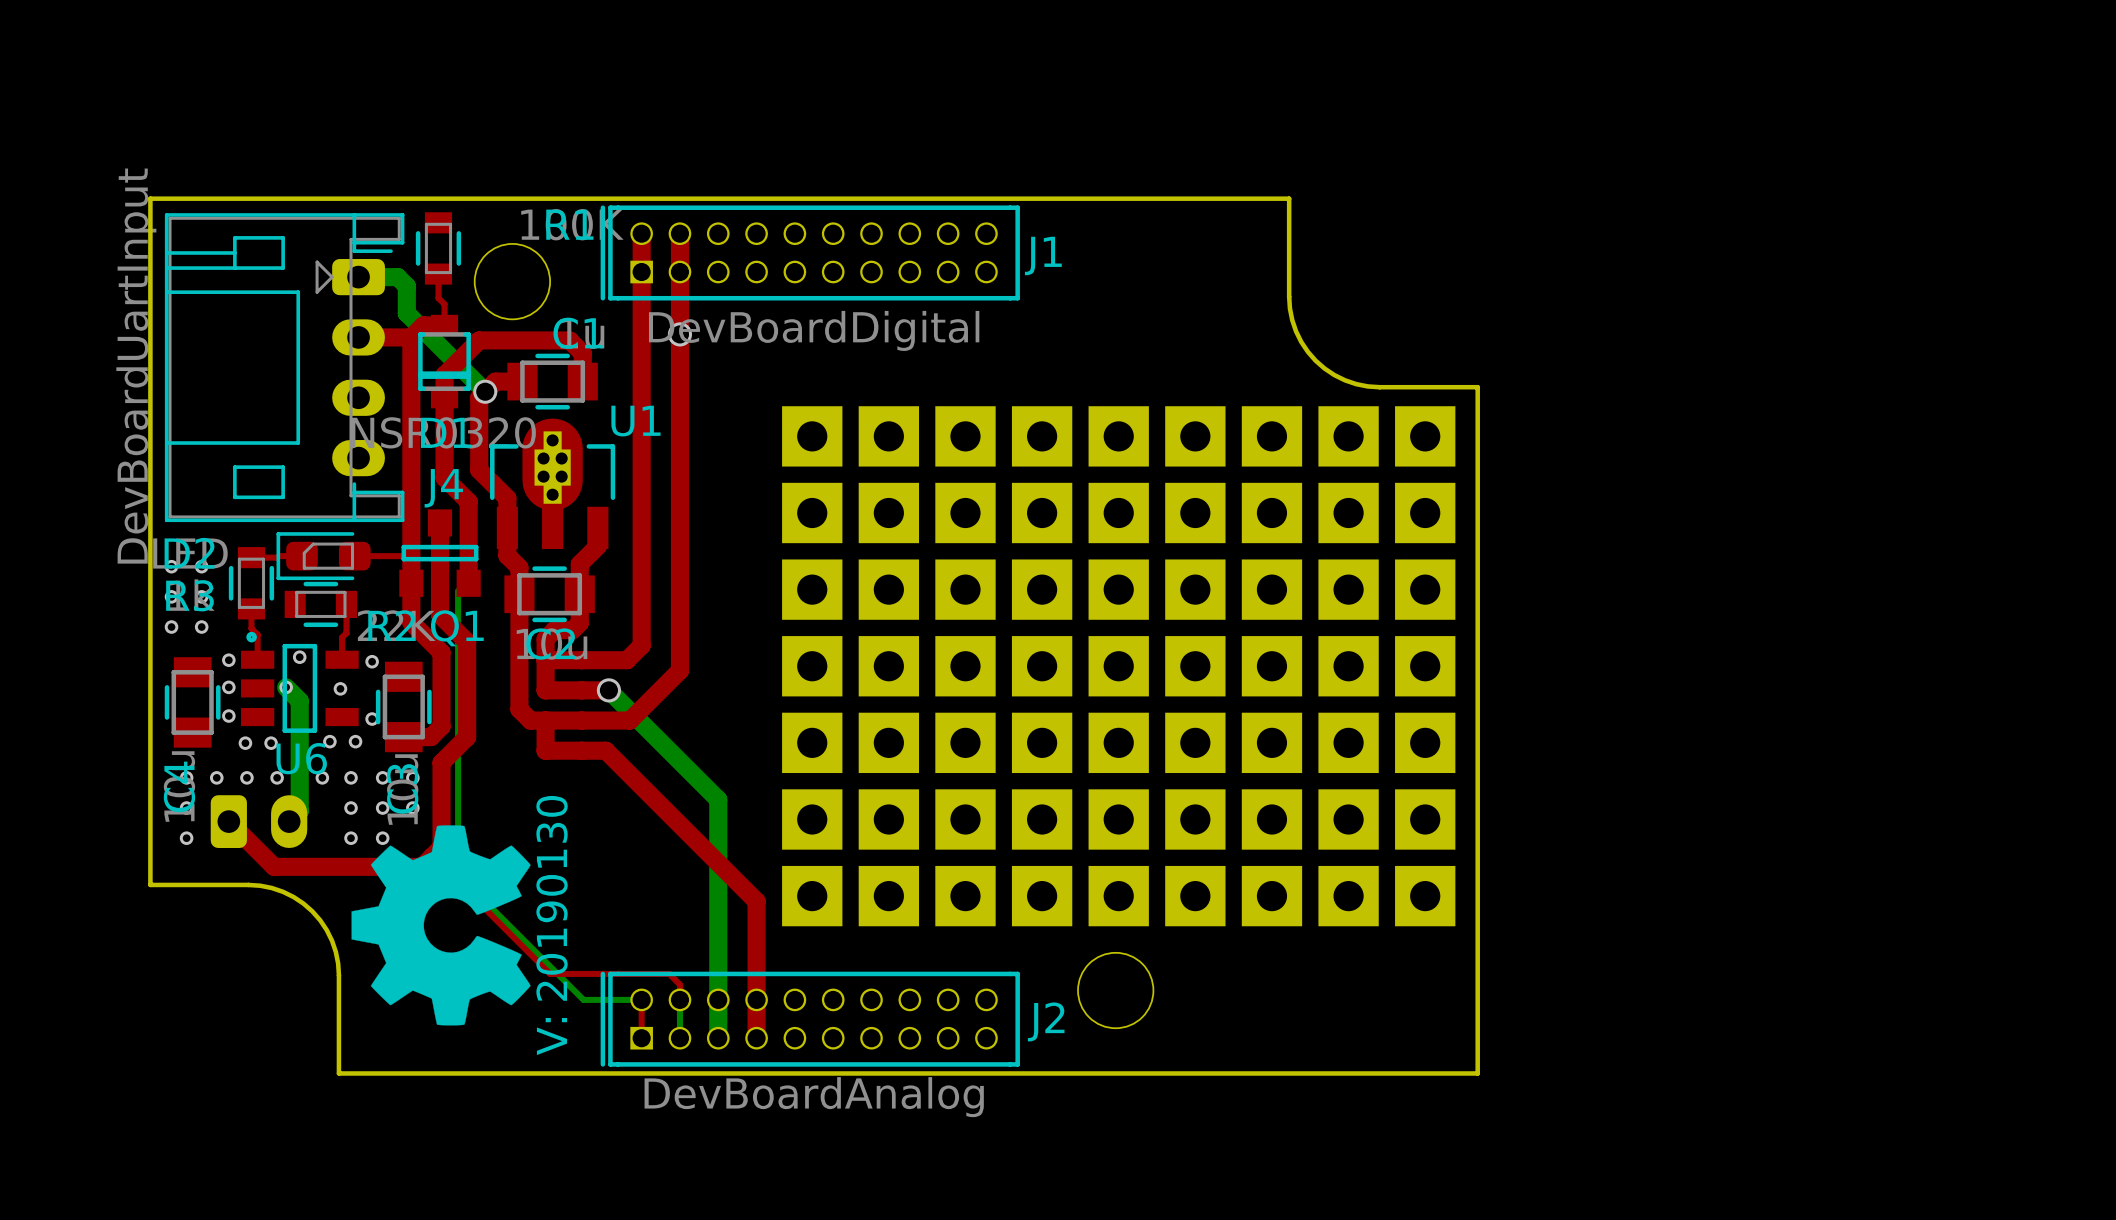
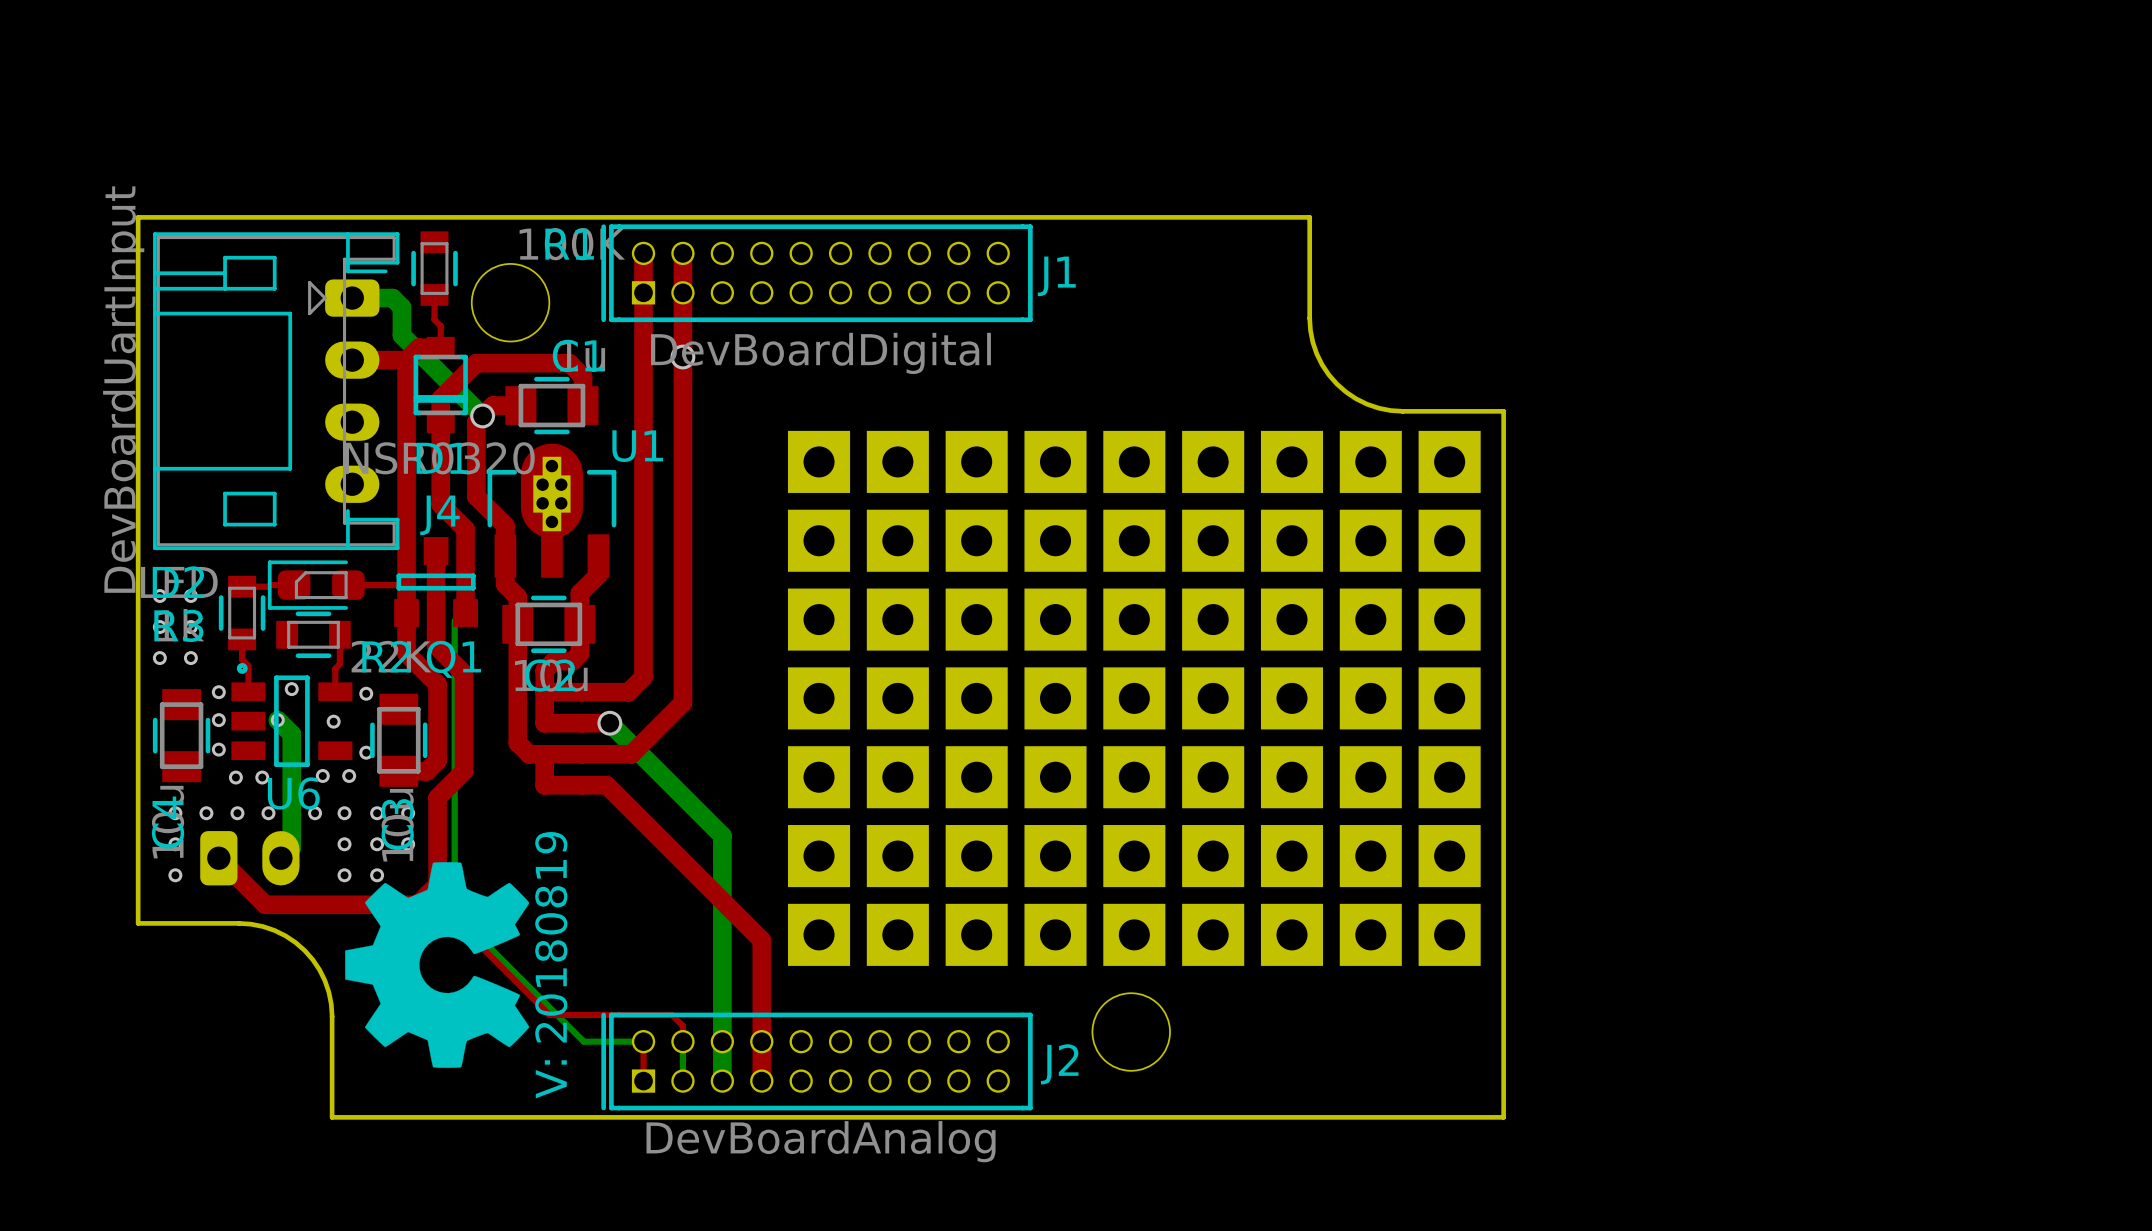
drawing shape: [536, 795, 568, 1056] -> [535, 832, 568, 1099]

